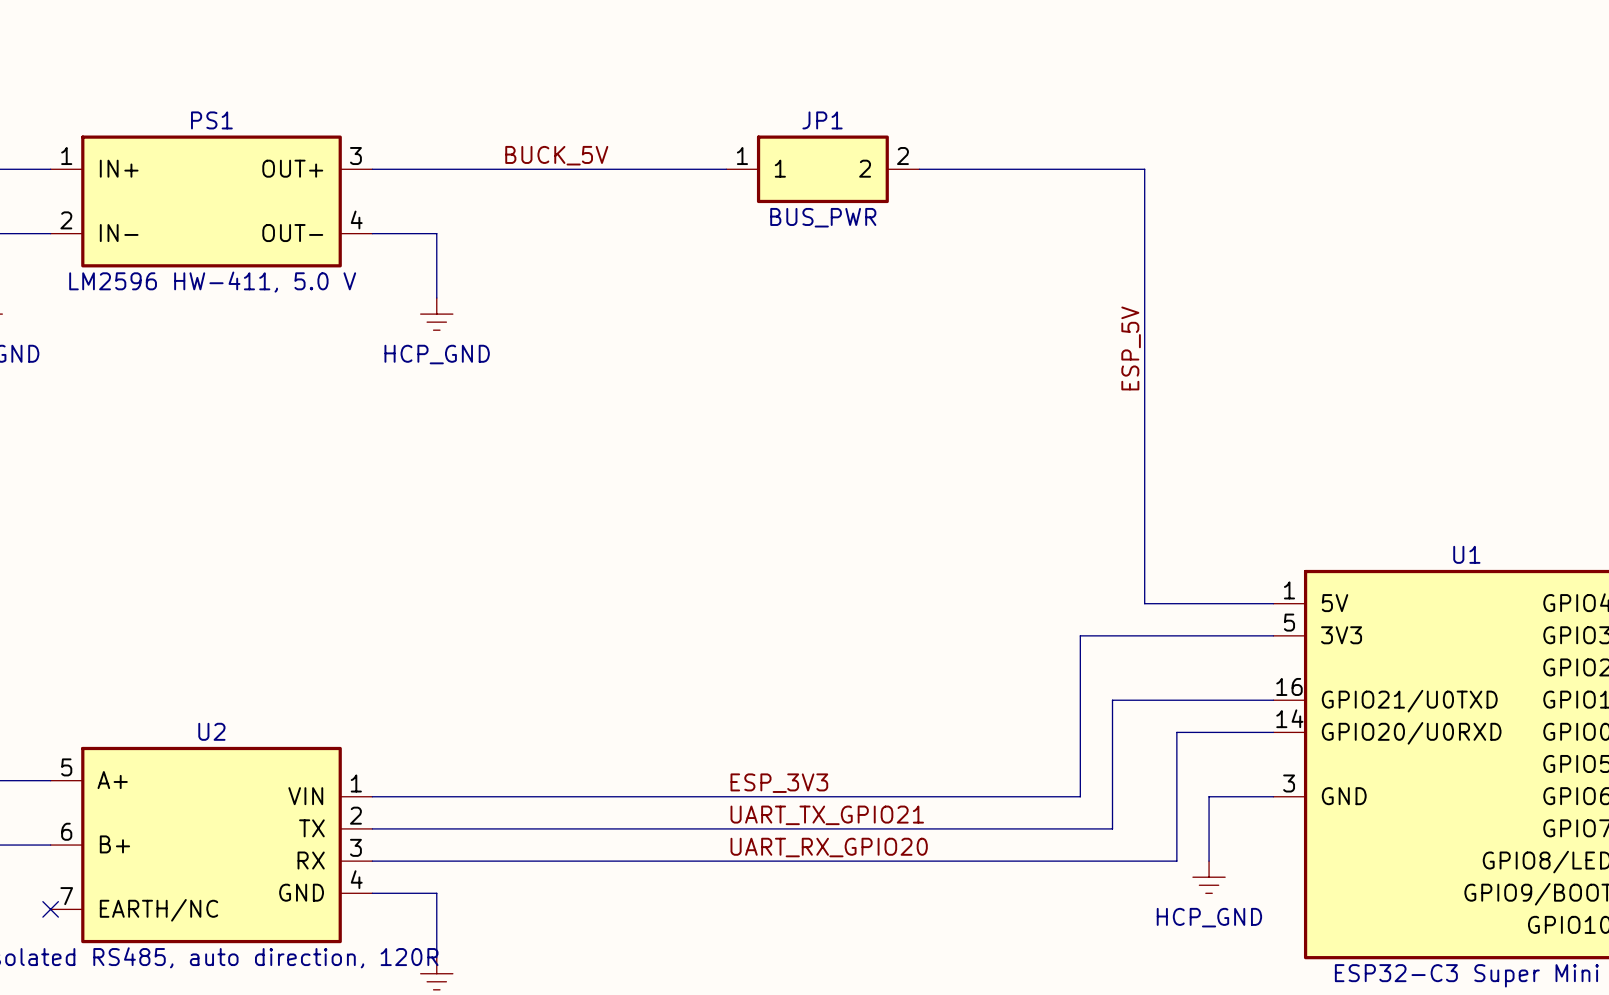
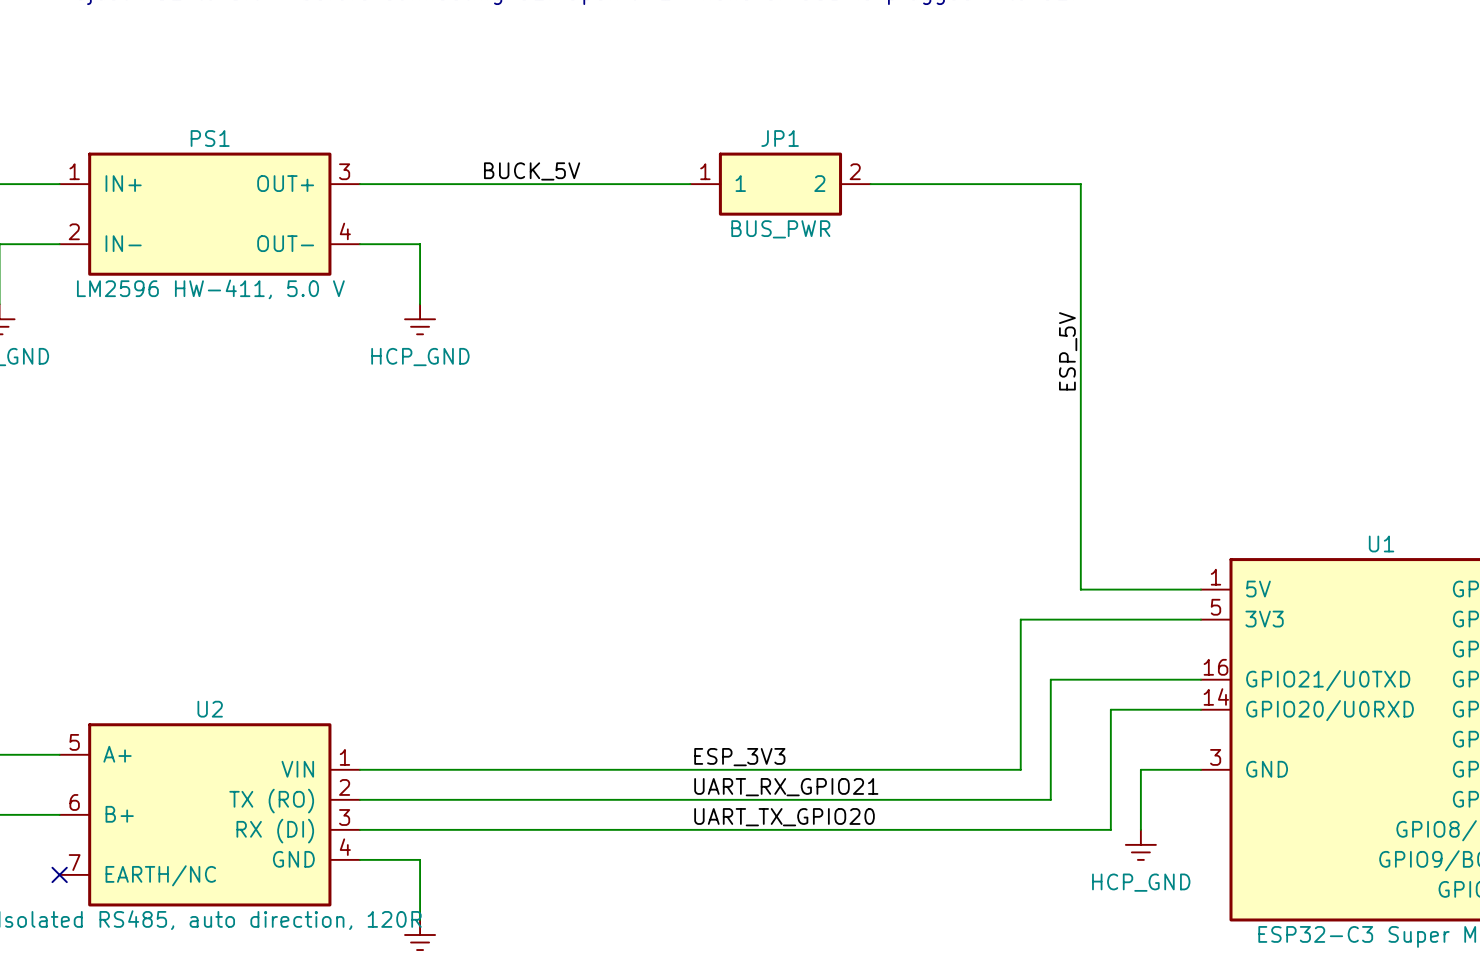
label: UART_TX_GPIO21 (827, 815) -> UART_RX_GPIO21 (786, 787)
U2 pin name: TX (311, 828) -> TX (RO) (271, 801)
label: UART_RX_GPIO20 (829, 847) -> UART_TX_GPIO20 (784, 817)
U2 pin name: RX (311, 860) -> RX (DI) (275, 831)

